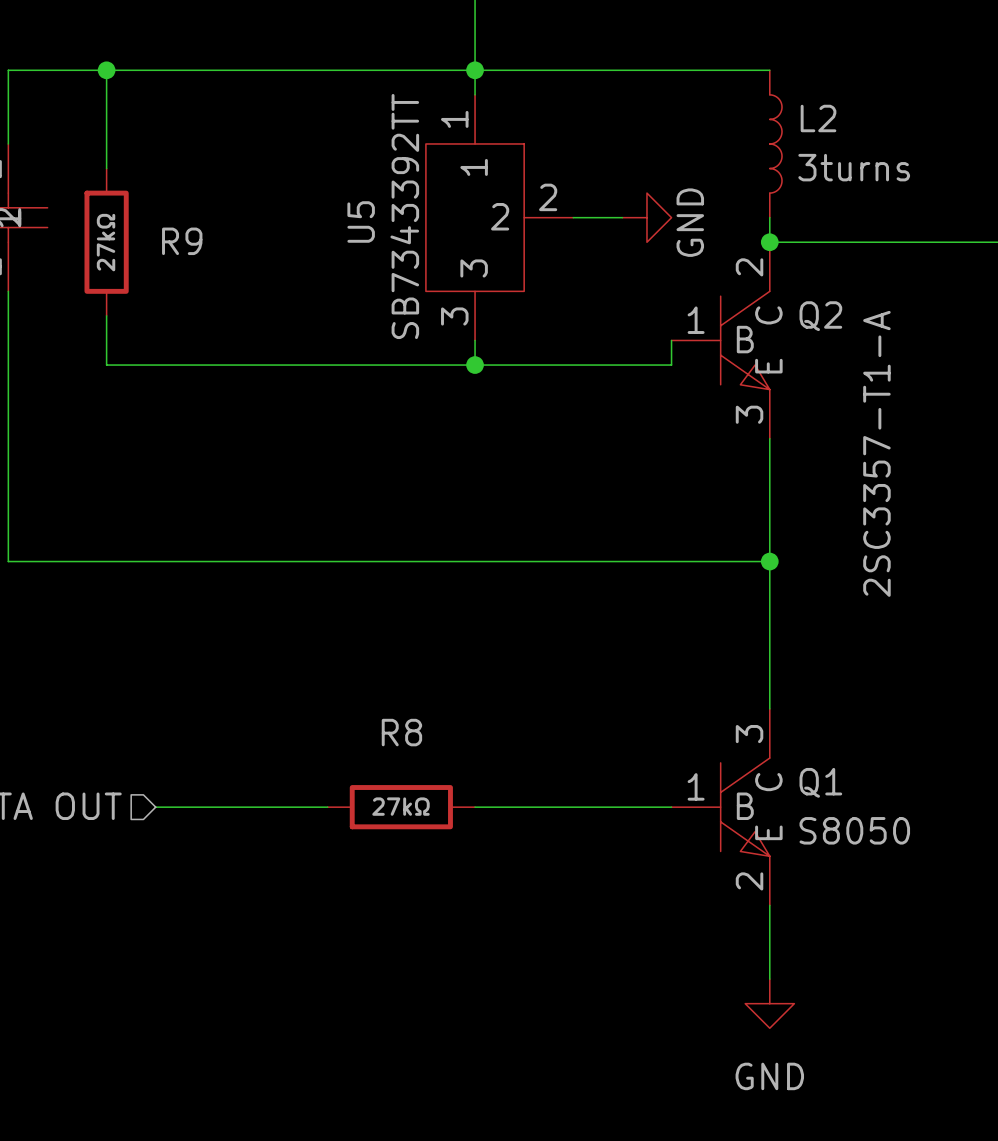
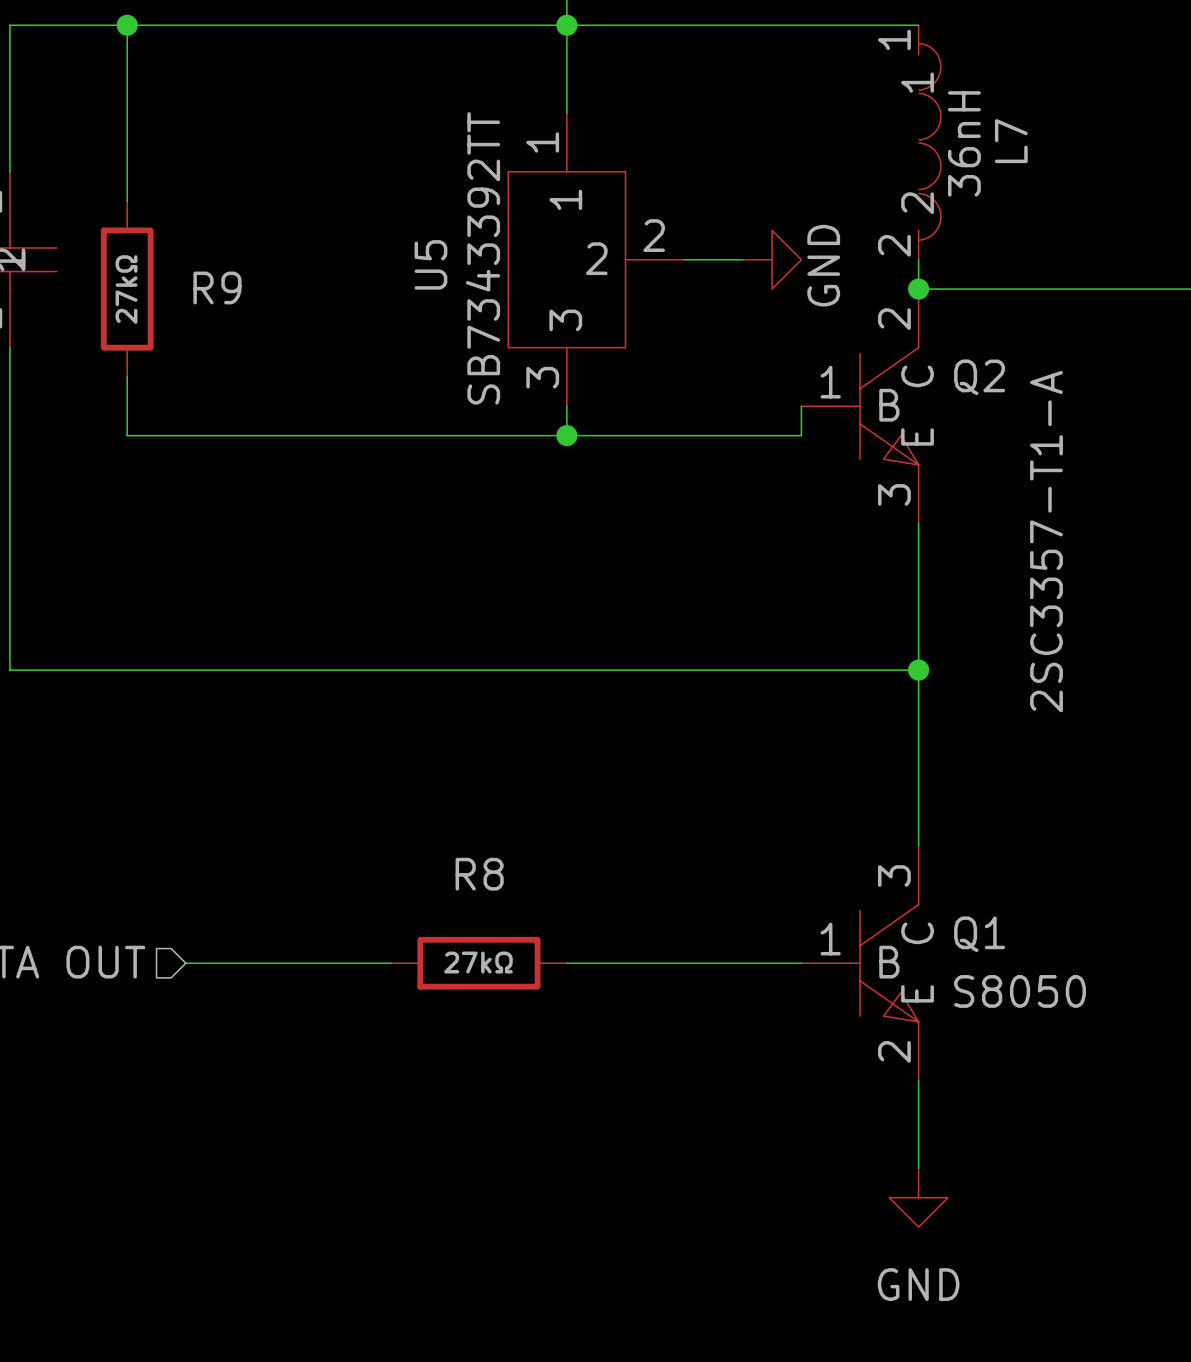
wire: none -> (127, 25) (127, 83)
wire: (8, 70) (769, 70) -> (9, 83) (9, 25) (918, 25)
junction position: (106, 70) -> (127, 25)
junction position: (475, 70) -> (566, 25)
L7: none -> 36nH (929, 142)
L2: 3turns (775, 143) -> none

